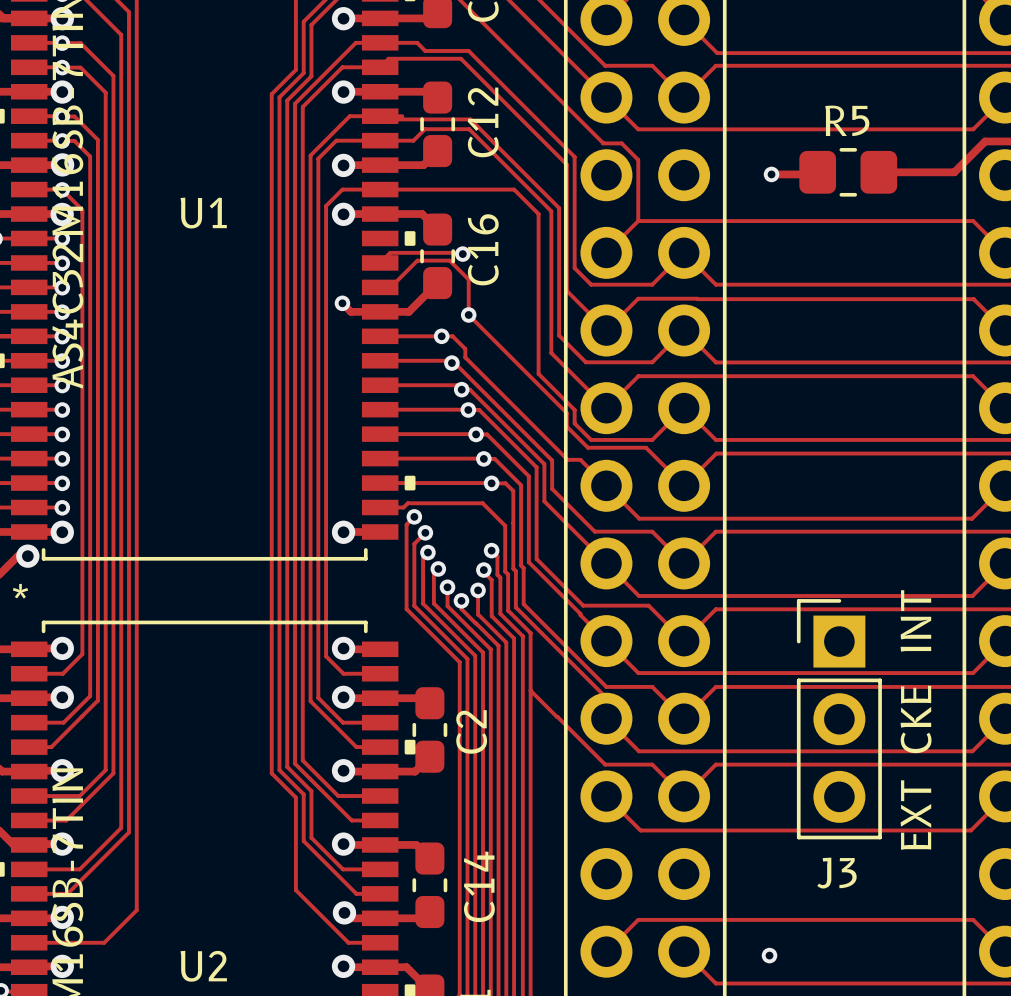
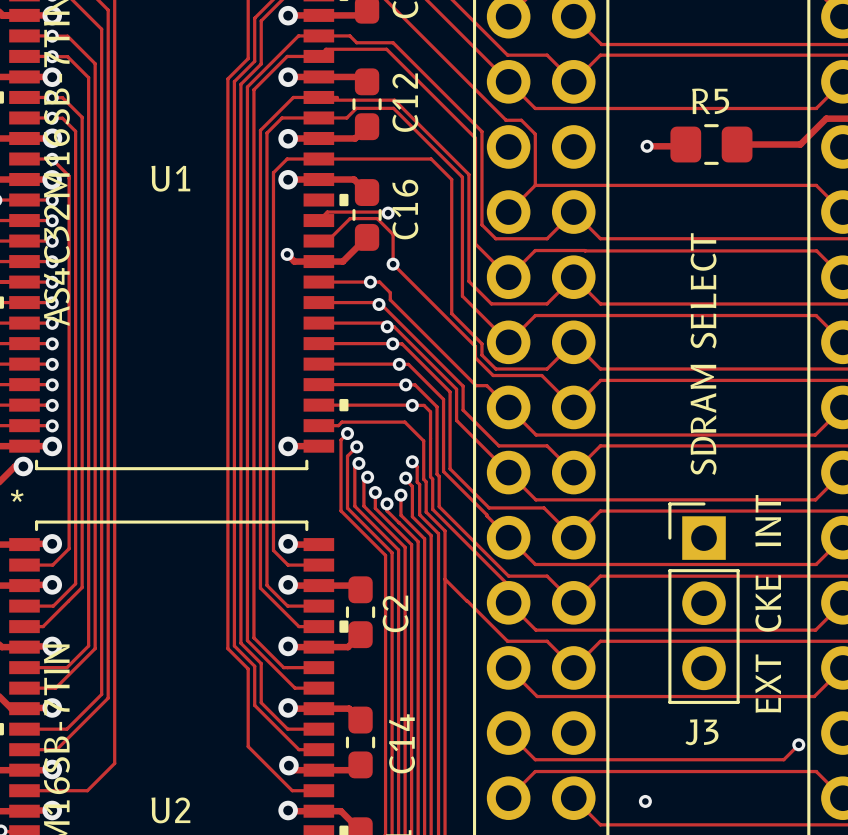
text: none -> SDRAM SELECT (703, 354)
track: none -> (508, 733) (535, 759) (783, 759) (798, 744)
via: none -> (798, 744)

